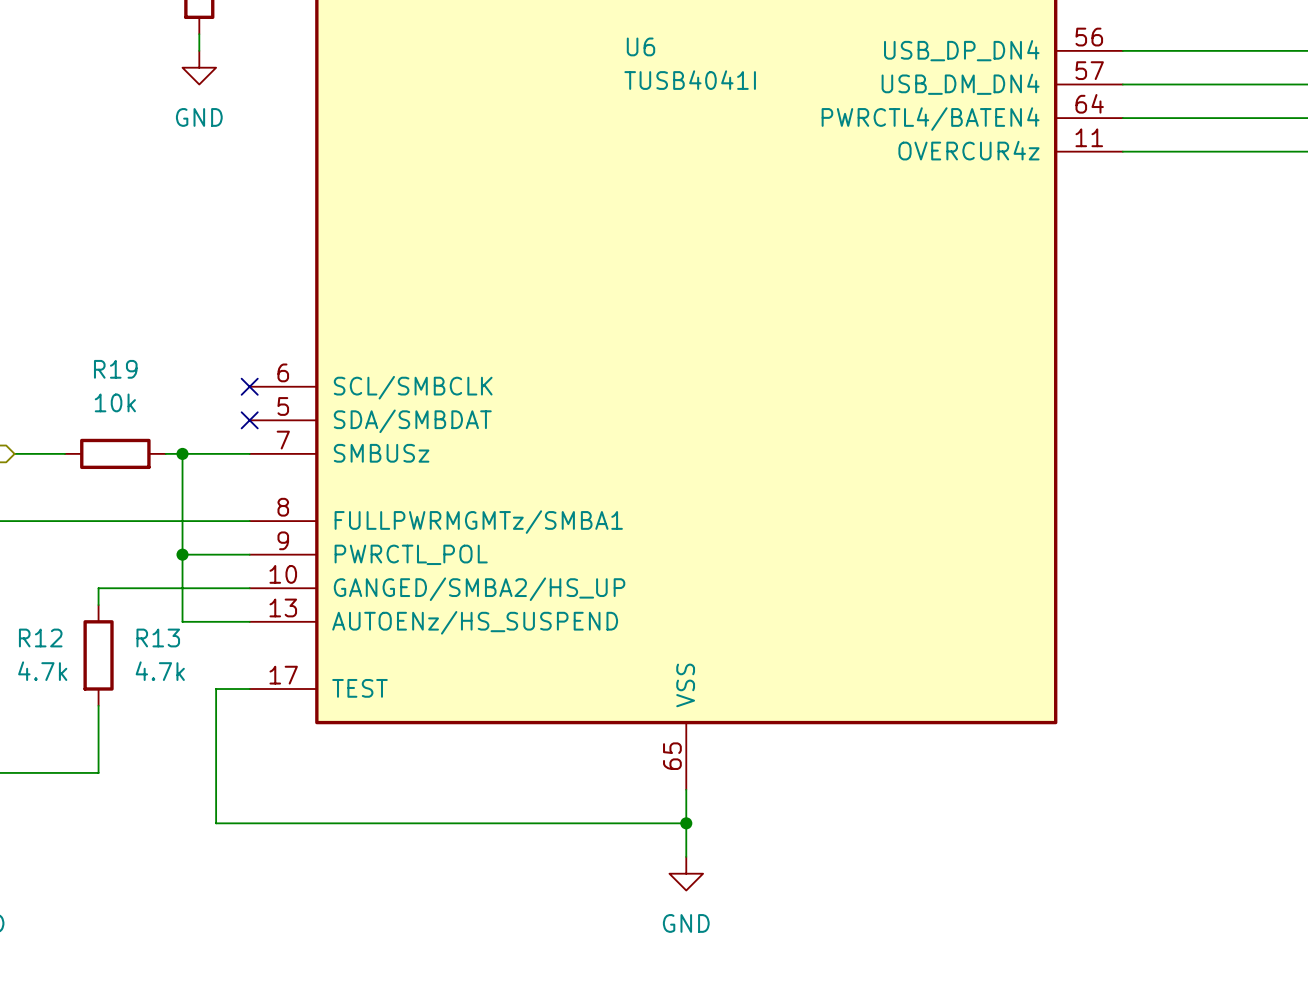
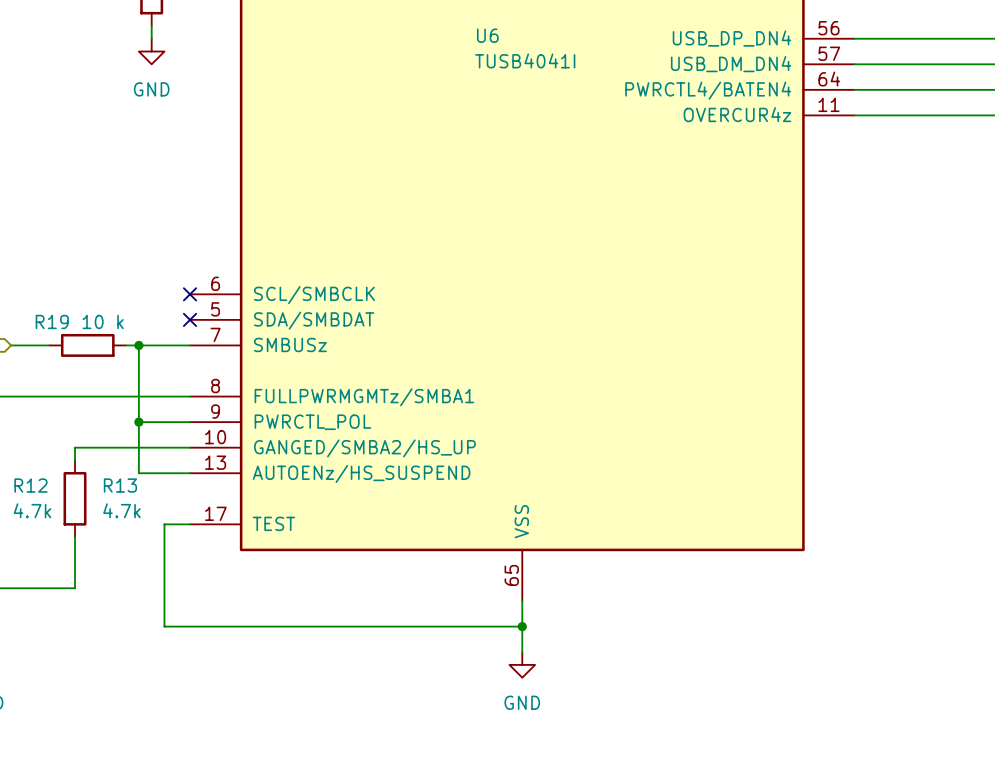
R19 name position: R19 (115, 369) -> R19 (52, 321)
R19 value: 10k (115, 402) -> 10 k (103, 321)

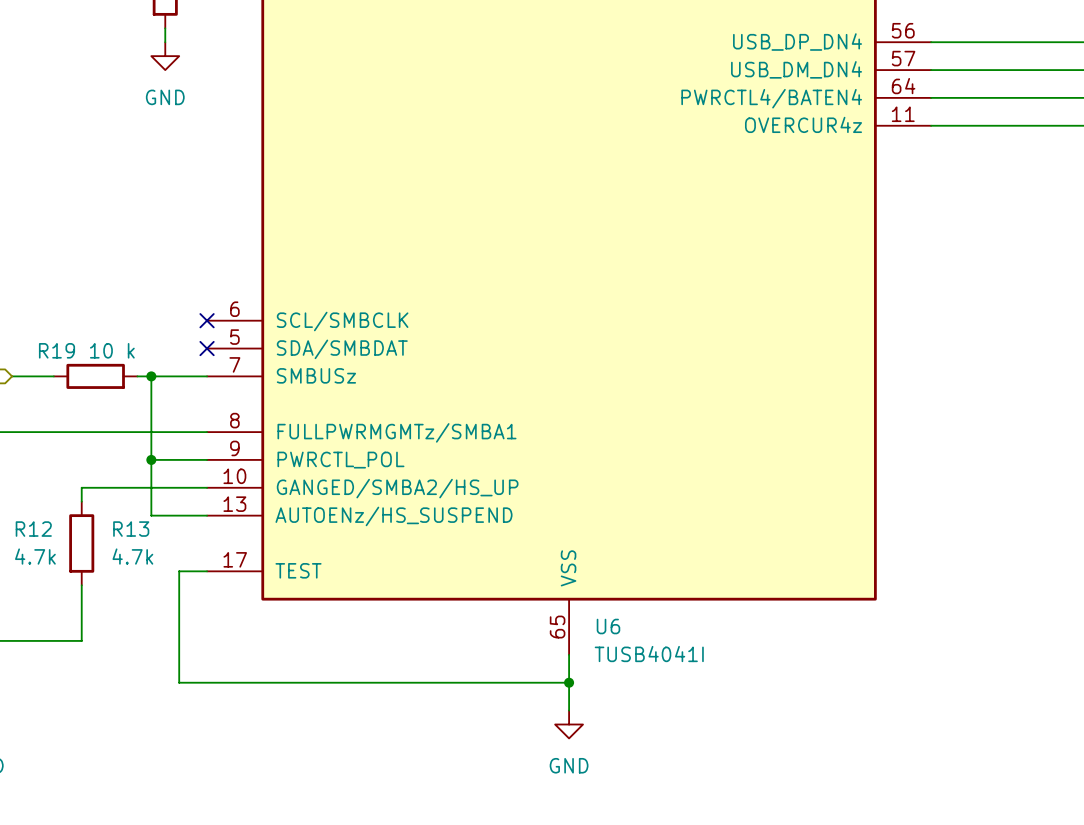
U6 name position: U6 (487, 35) -> U6 (608, 626)
U6 value position: TUSB4041I (525, 60) -> TUSB4041I (649, 654)

